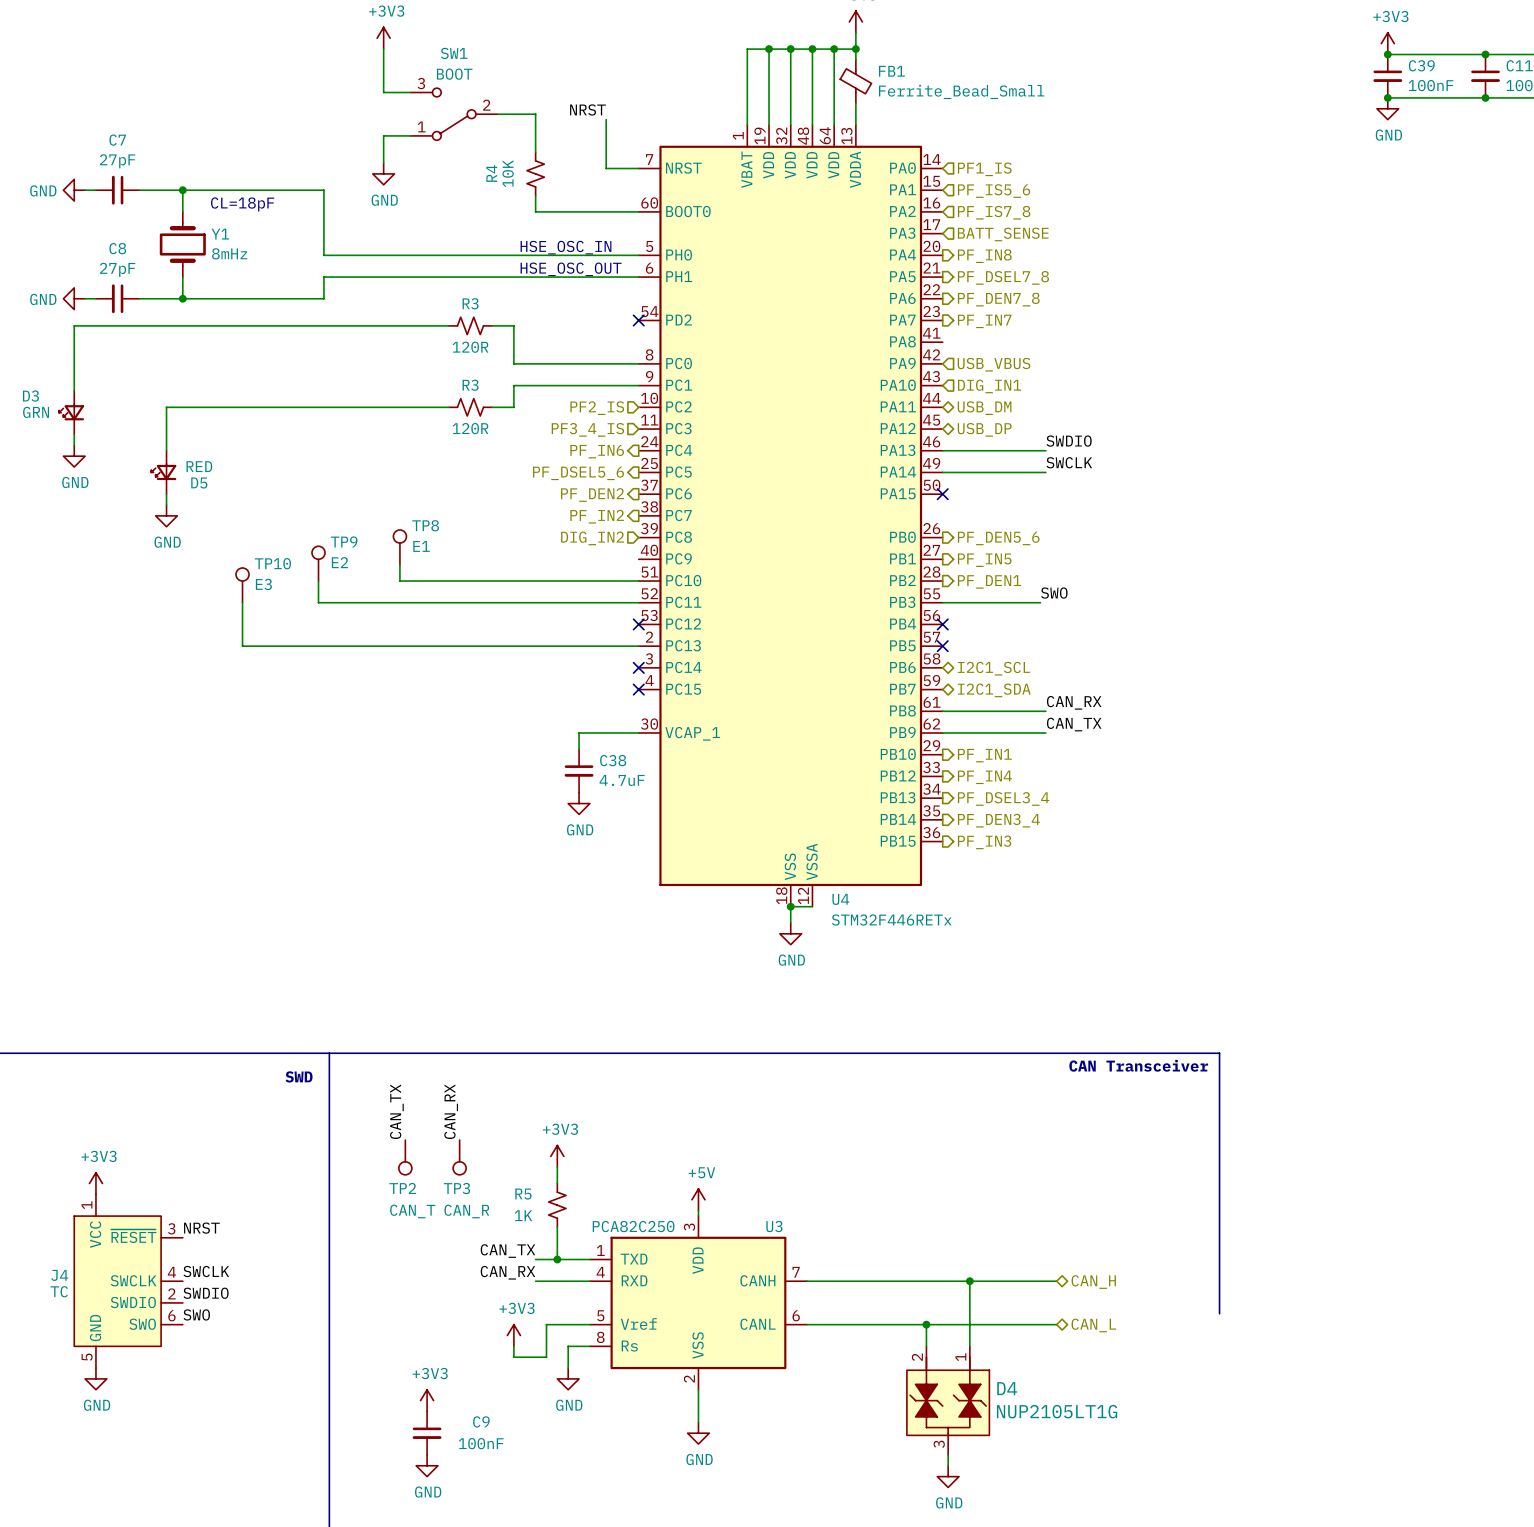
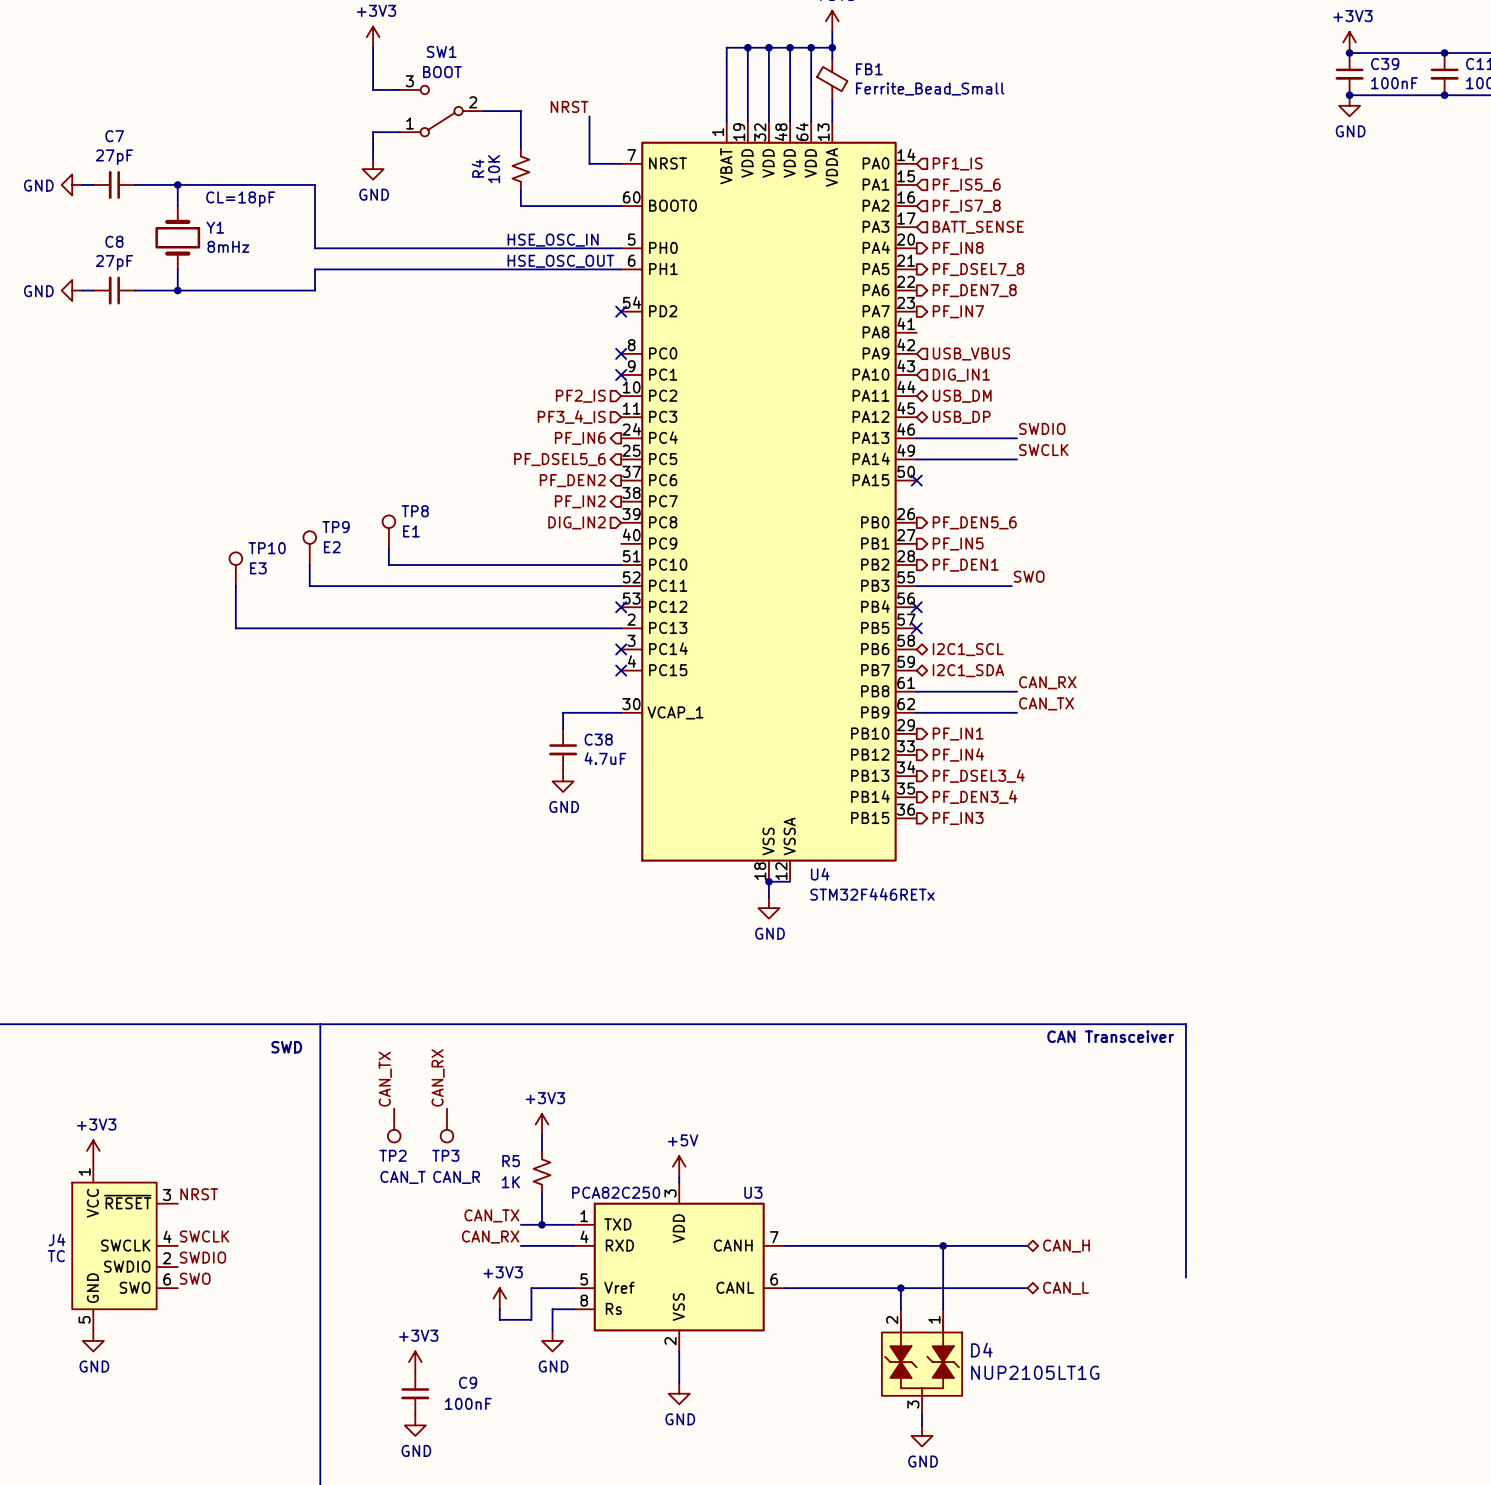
wire: (448, 325) (74, 325) (74, 391) -> none
R3: 120R (470, 325) -> none
wire: (492, 325) (513, 325) (513, 363) (638, 363) -> none
no-connect mark: none -> (621, 353)
wire: (638, 385) (513, 385) (513, 407) (492, 407) -> none
no-connect mark: none -> (621, 374)
wire: (448, 407) (166, 407) (166, 450) -> none
R3: 120R (470, 407) -> none
D3: GRN (71, 412) -> none
wire: (74, 434) (74, 445) -> none
power symbol: GND (74, 456) -> none
D5: RED (163, 472) -> none
wire: (166, 494) (166, 505) -> none
power symbol: GND (166, 515) -> none

